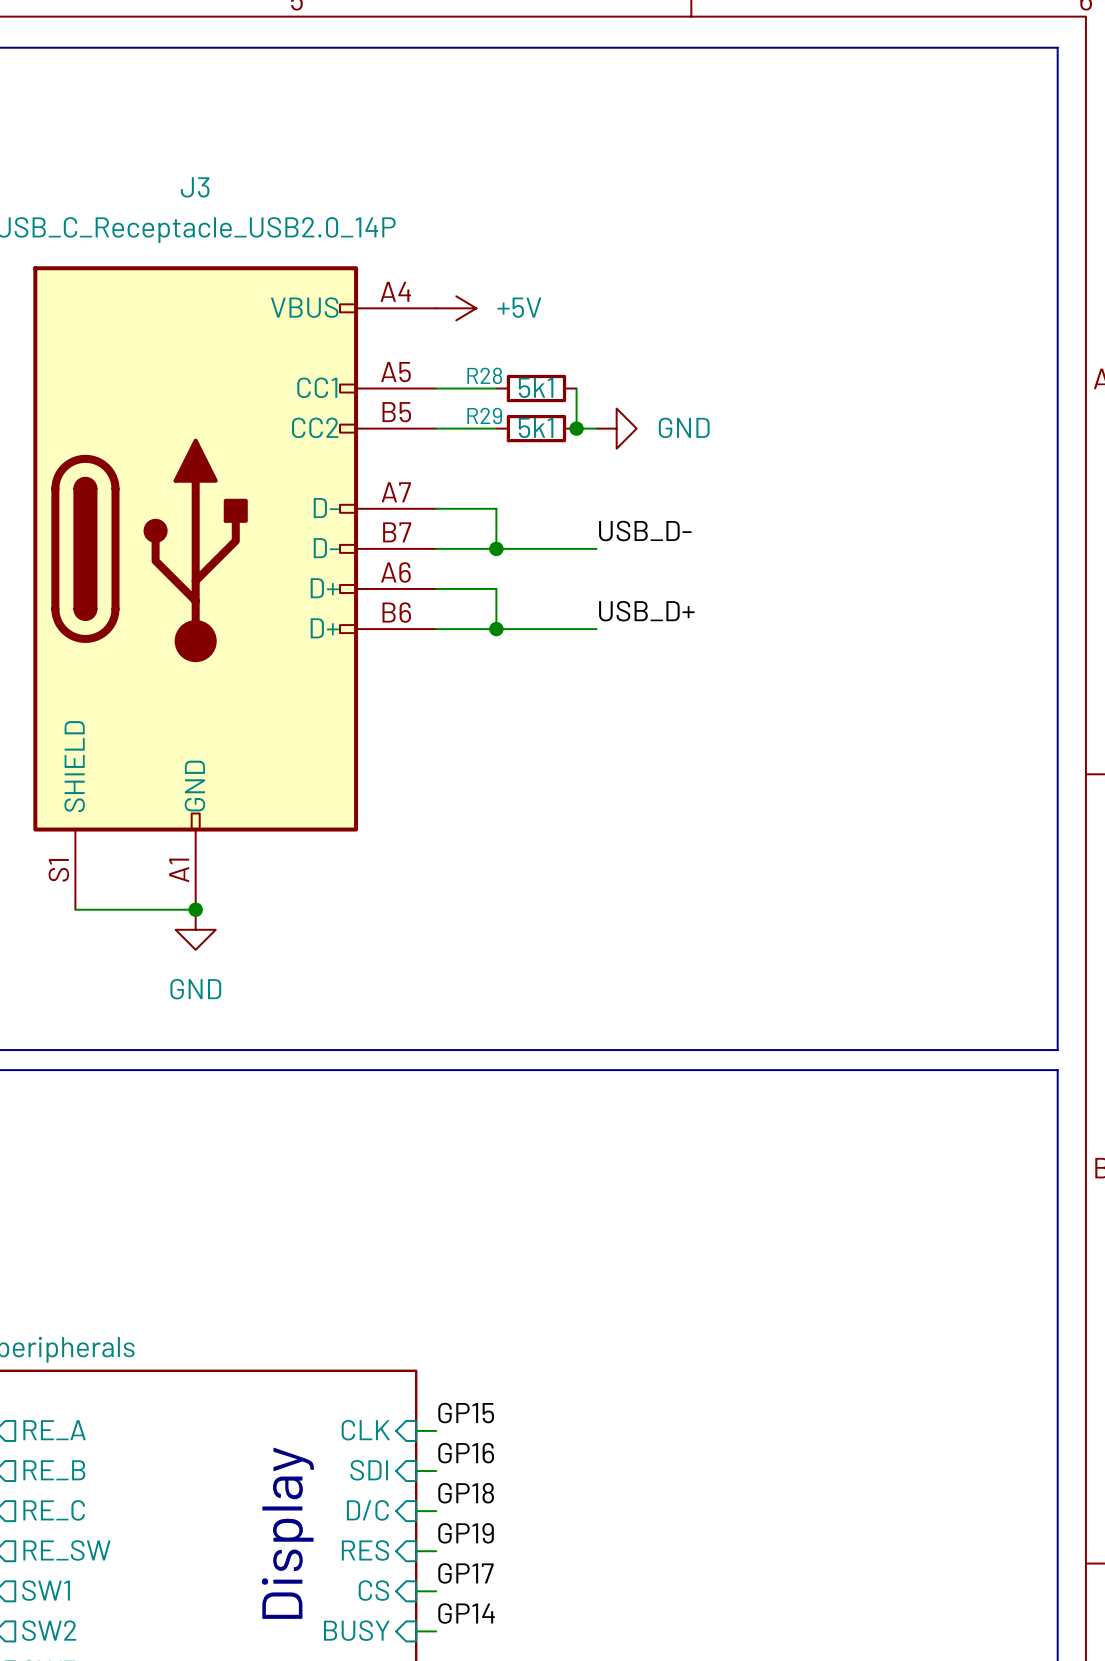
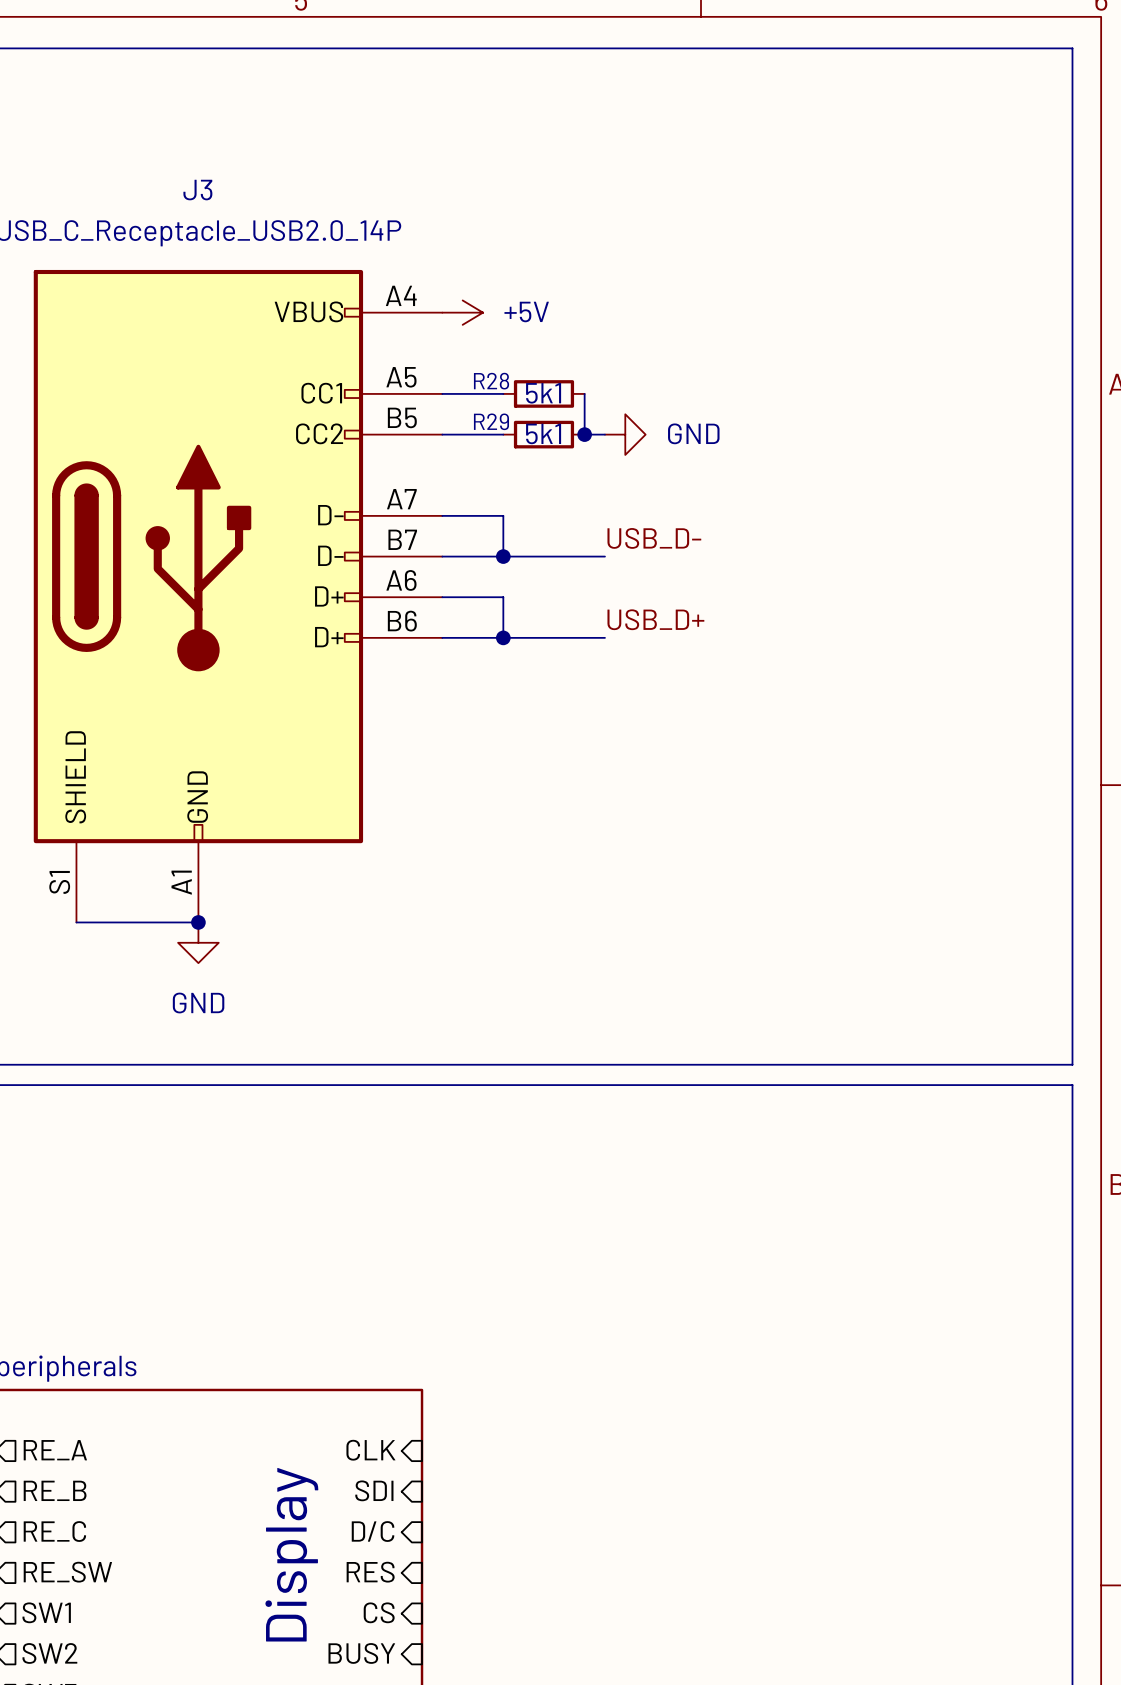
label: GP15 (466, 1413) -> none
wire: (416, 1430) (436, 1430) -> none
label: GP16 (466, 1453) -> none
wire: (416, 1471) (436, 1471) -> none
label: GP18 (466, 1493) -> none
wire: (416, 1511) (436, 1511) -> none
label: GP19 (466, 1533) -> none
wire: (416, 1551) (436, 1551) -> none
label: GP17 (466, 1573) -> none
wire: (416, 1591) (436, 1591) -> none
label: GP14 (466, 1613) -> none
wire: (416, 1631) (436, 1631) -> none

